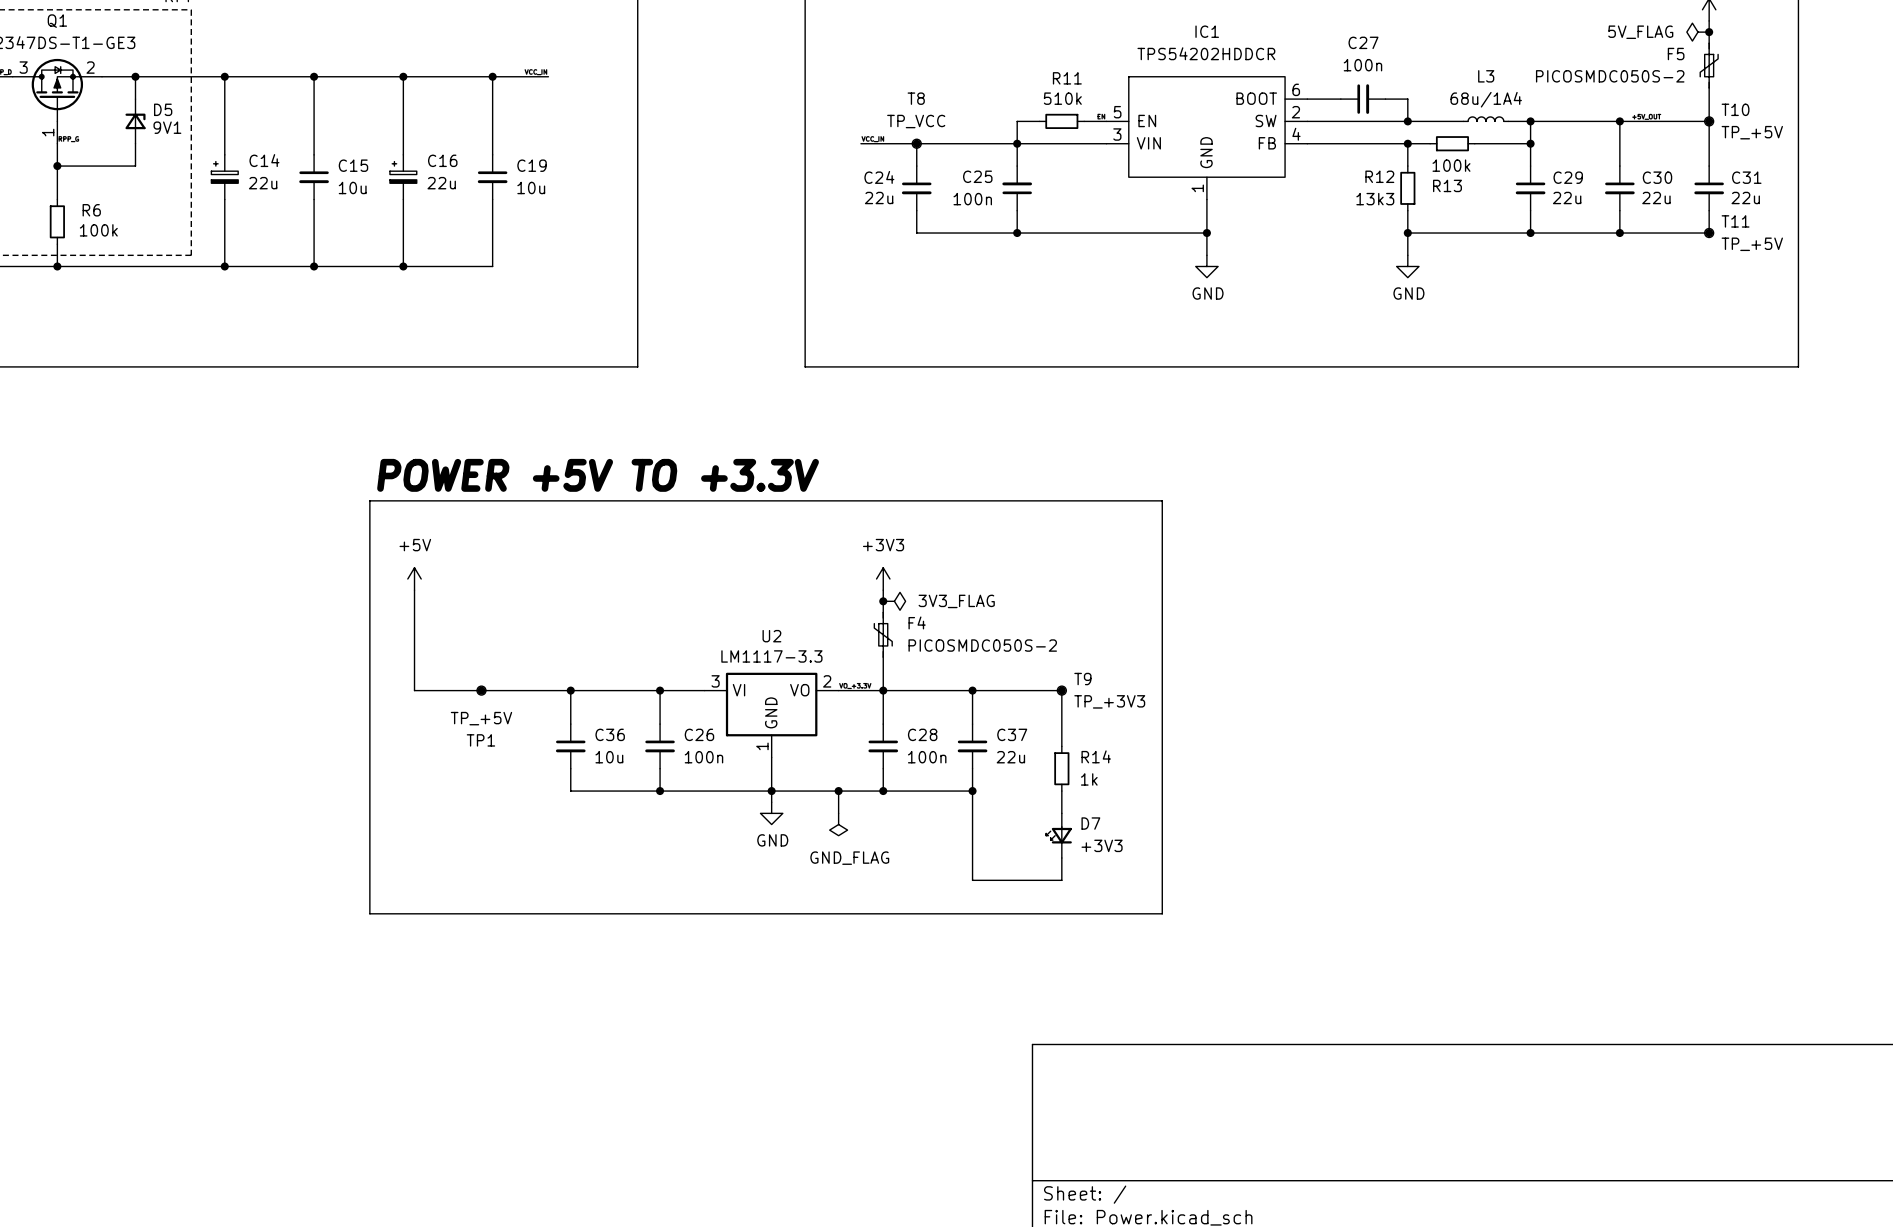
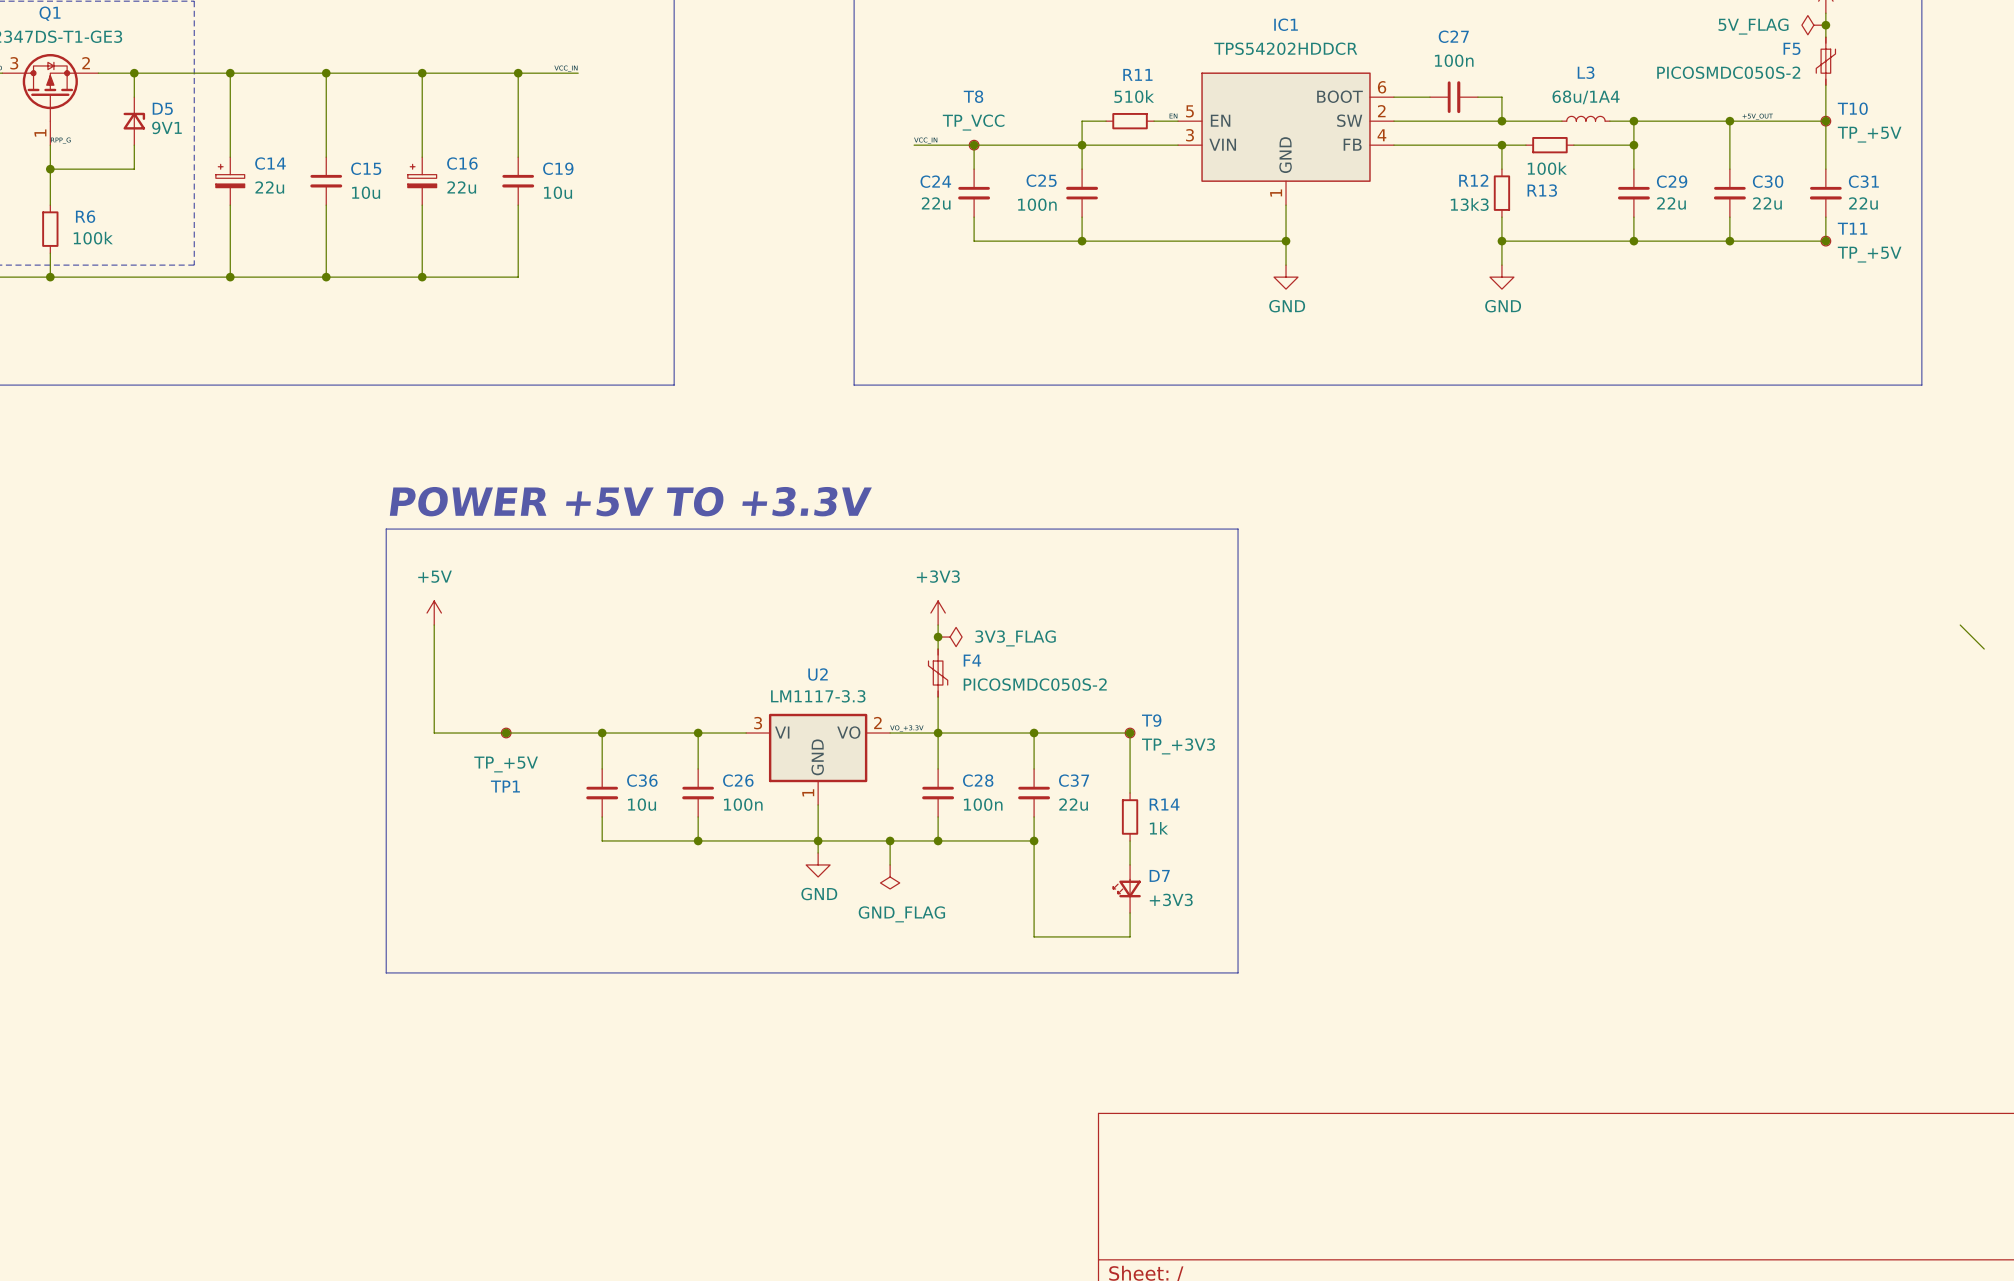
wire: none -> (1960, 625) (1984, 649)

